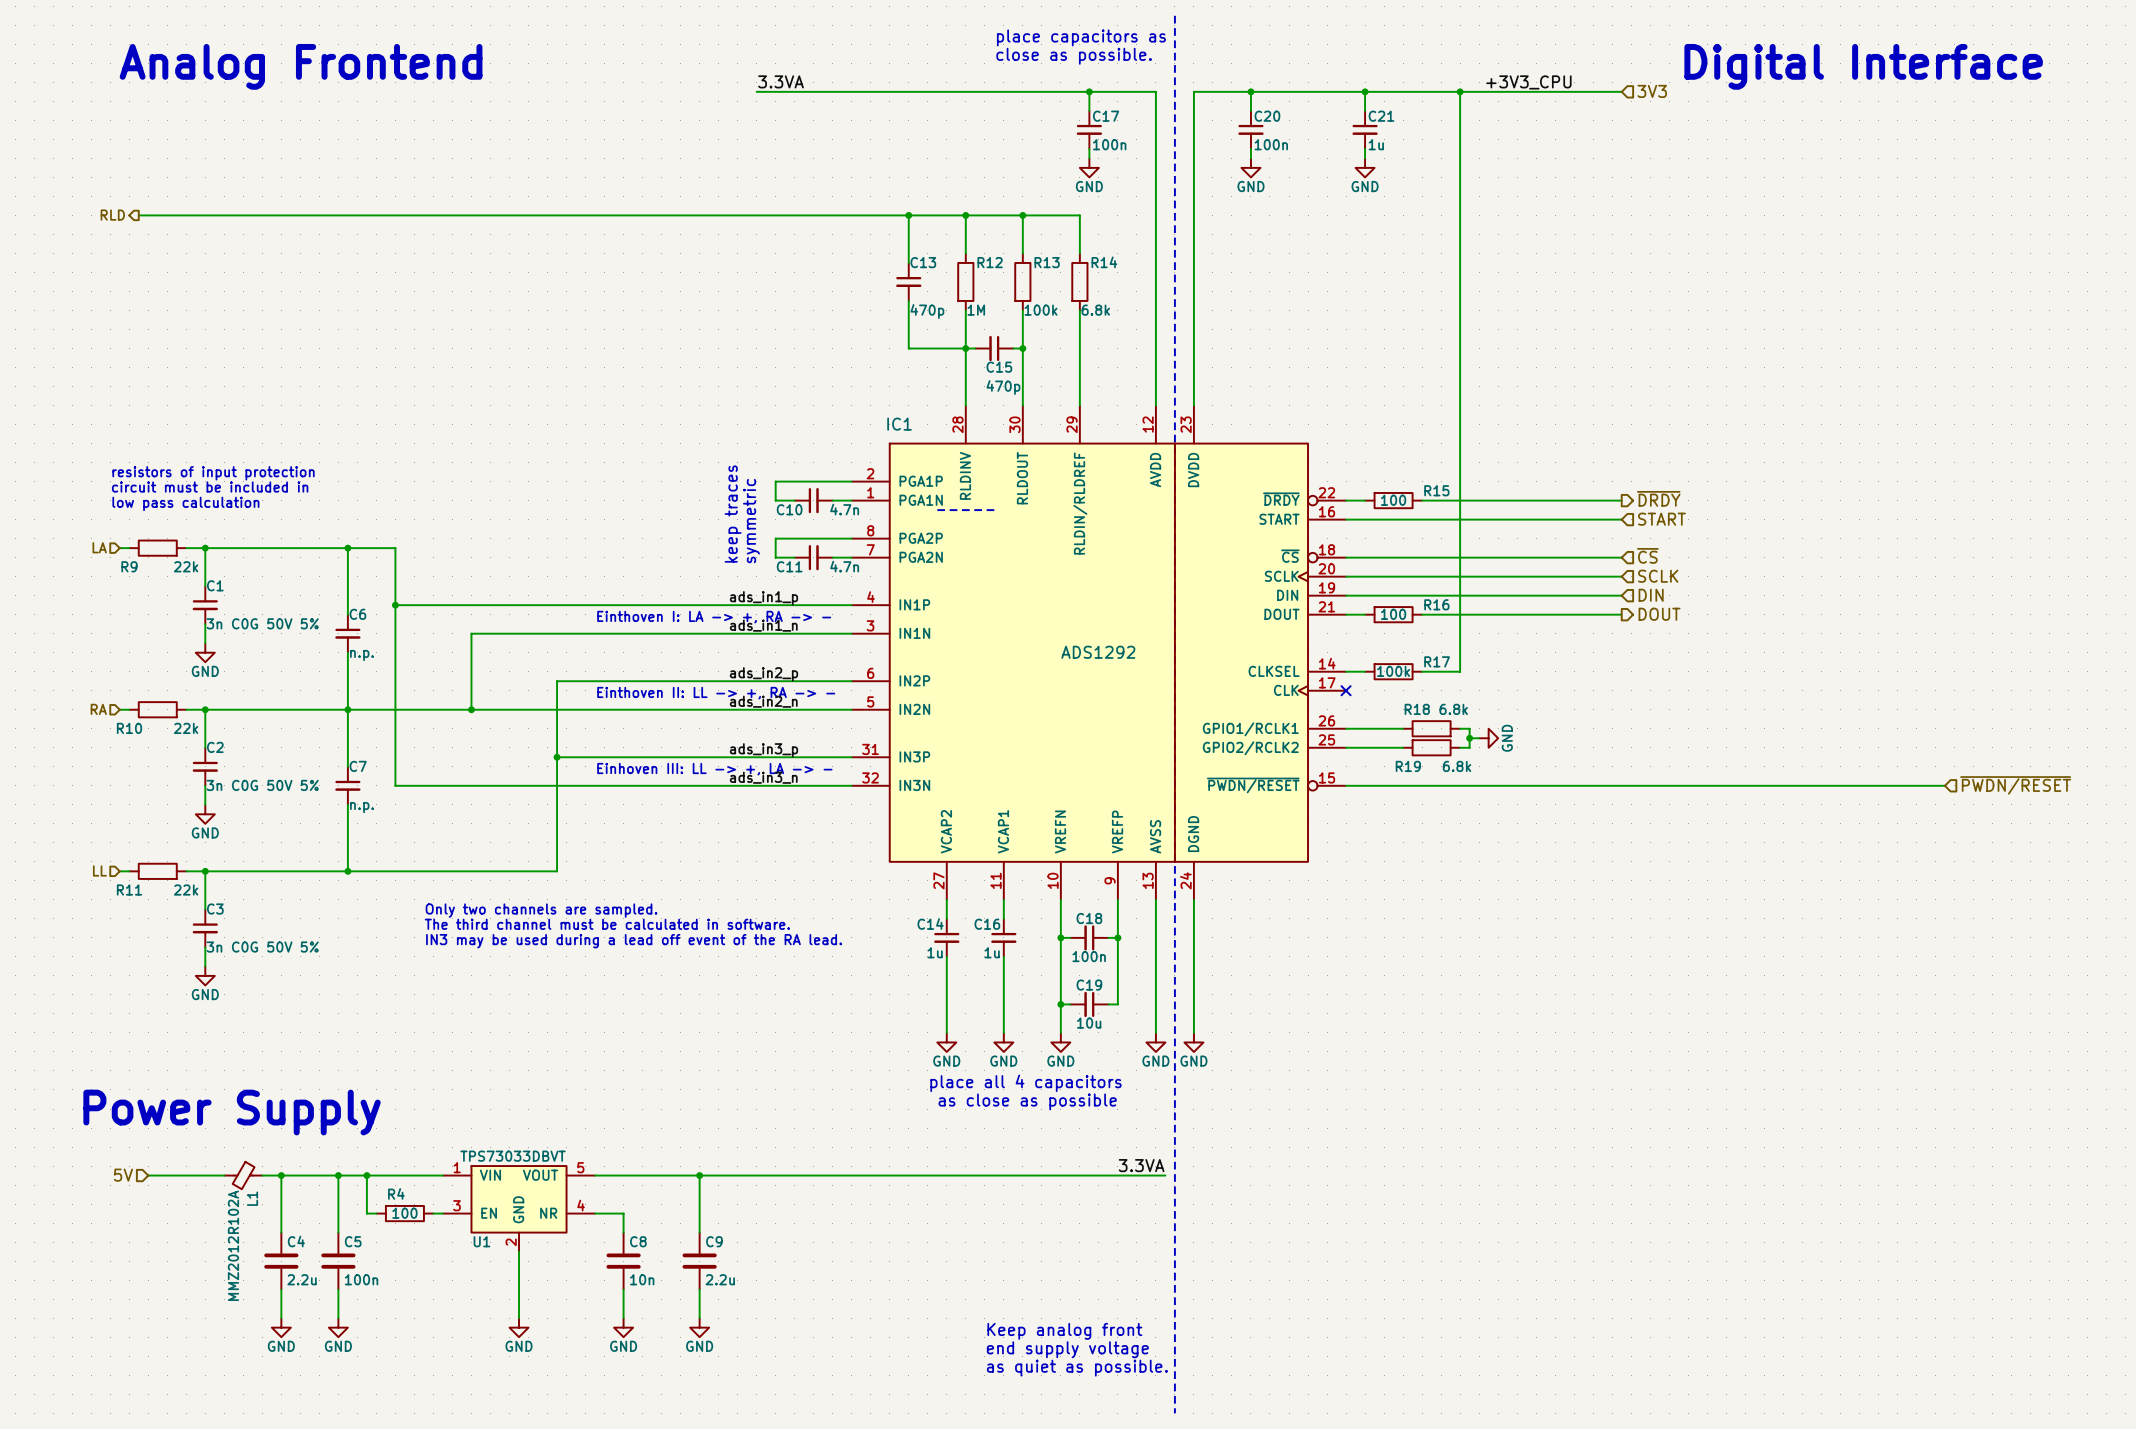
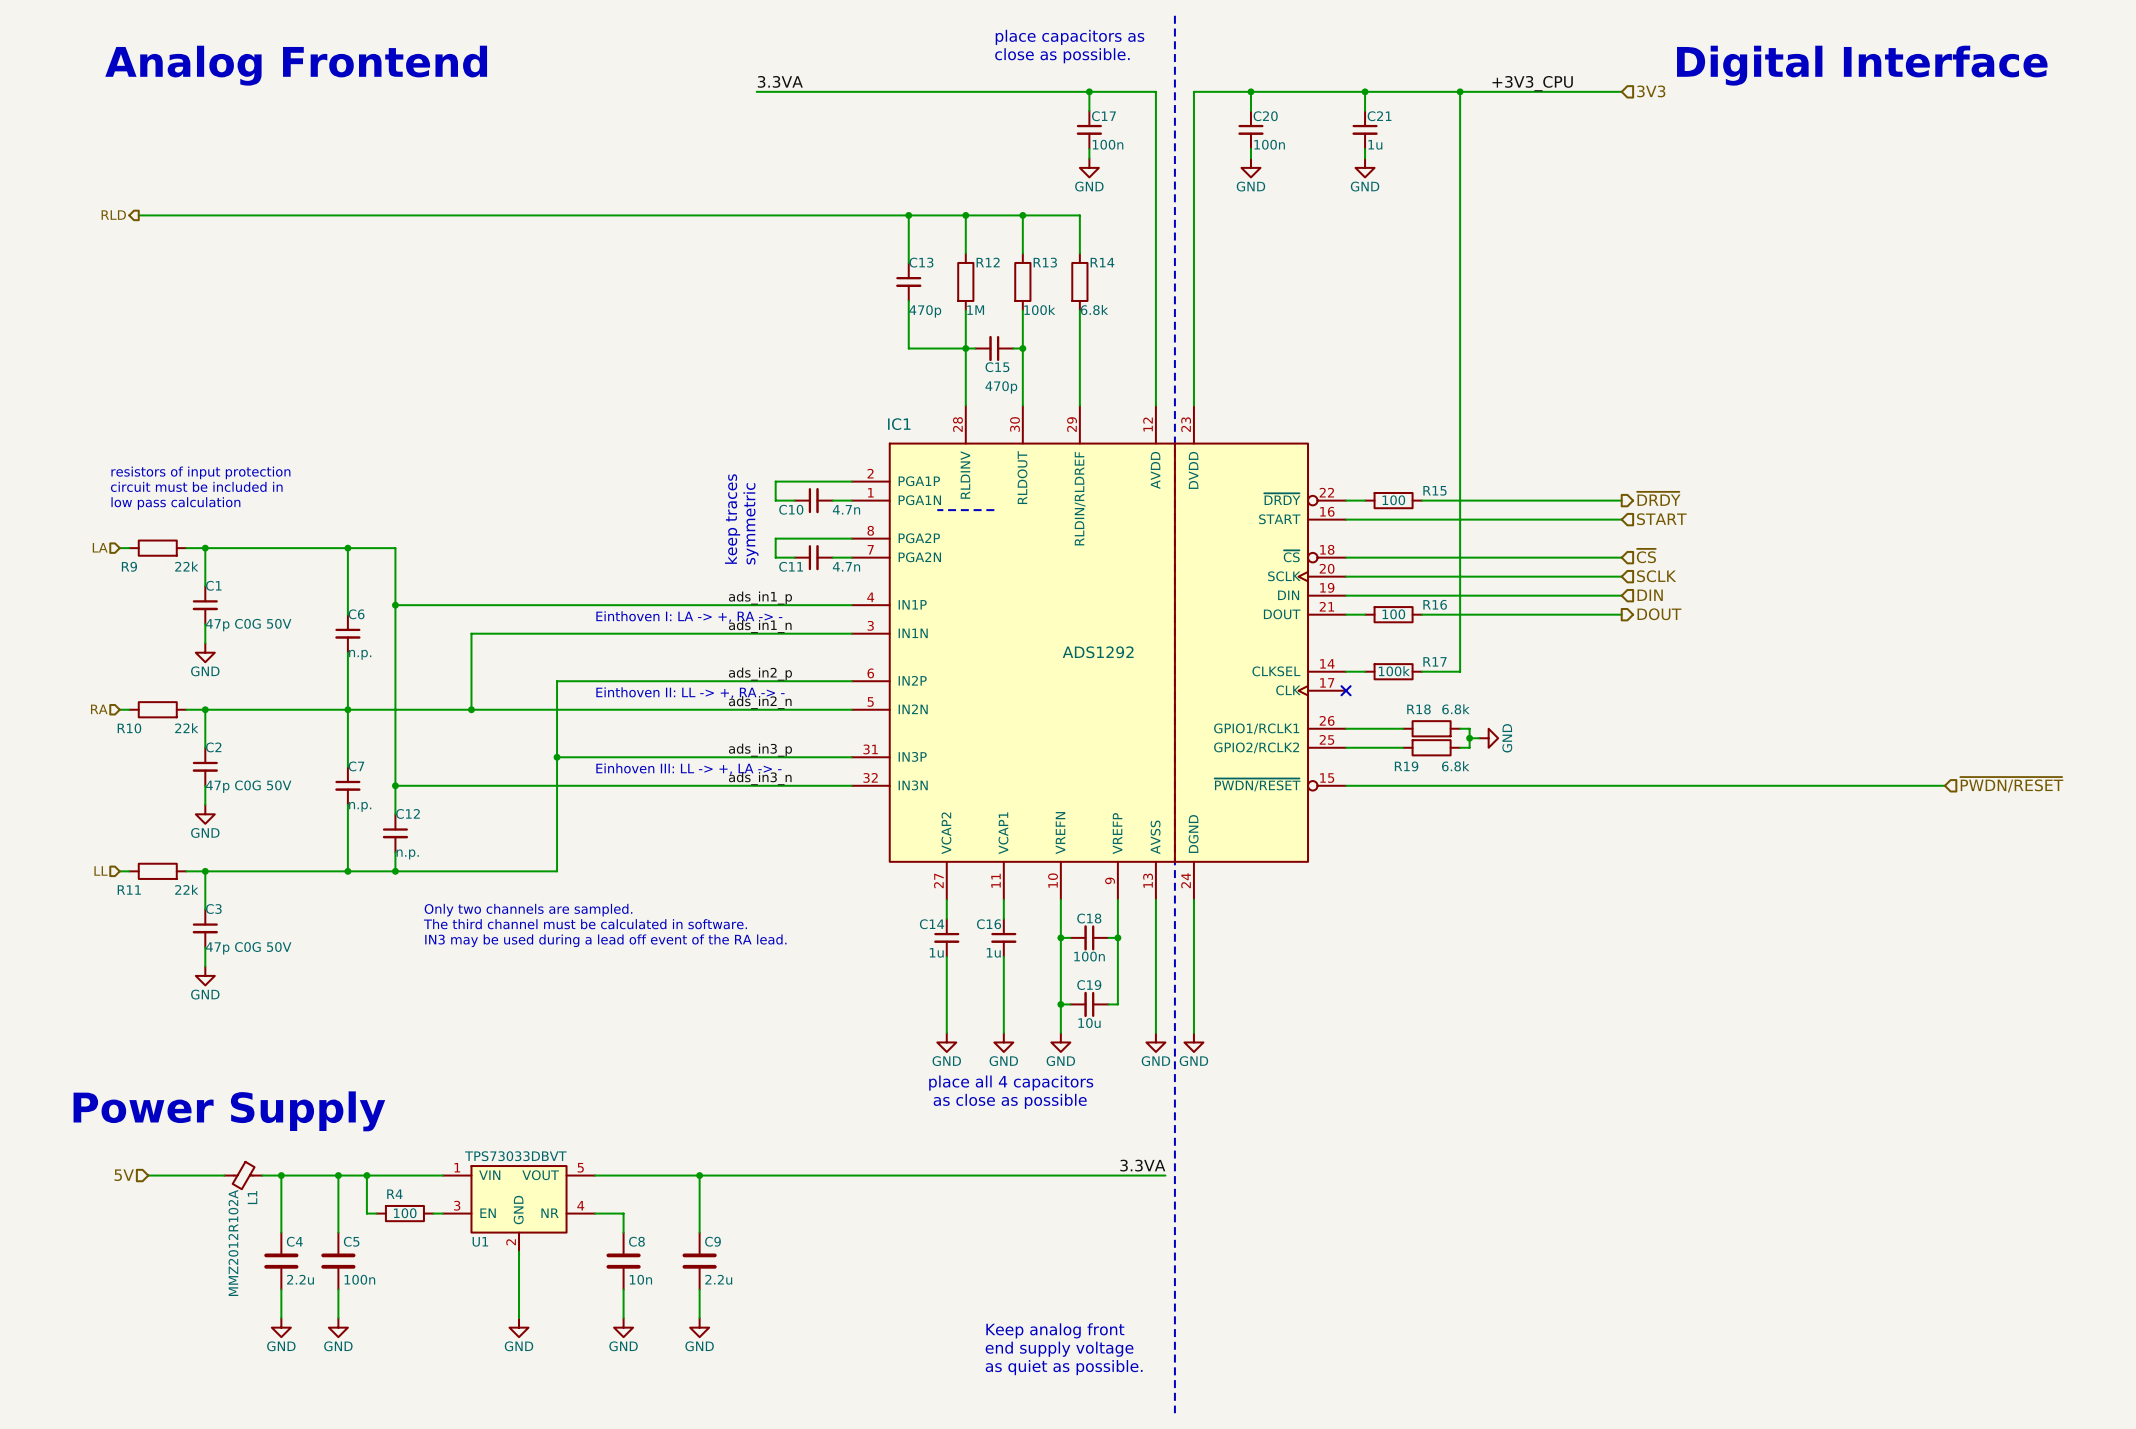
C1 value: 3n C0G 50V 5% (262, 623) -> 47p C0G 50V (248, 625)
C2 value: 3n C0G 50V 5% (262, 785) -> 47p C0G 50V (248, 786)
wire: none -> (395, 785) (395, 814)
junction: none -> (395, 785)
C12: none -> n.p. (395, 833)
wire: none -> (395, 852) (395, 871)
junction: none -> (395, 871)
C3 value: 3n C0G 50V 5% (262, 947) -> 47p C0G 50V (248, 948)

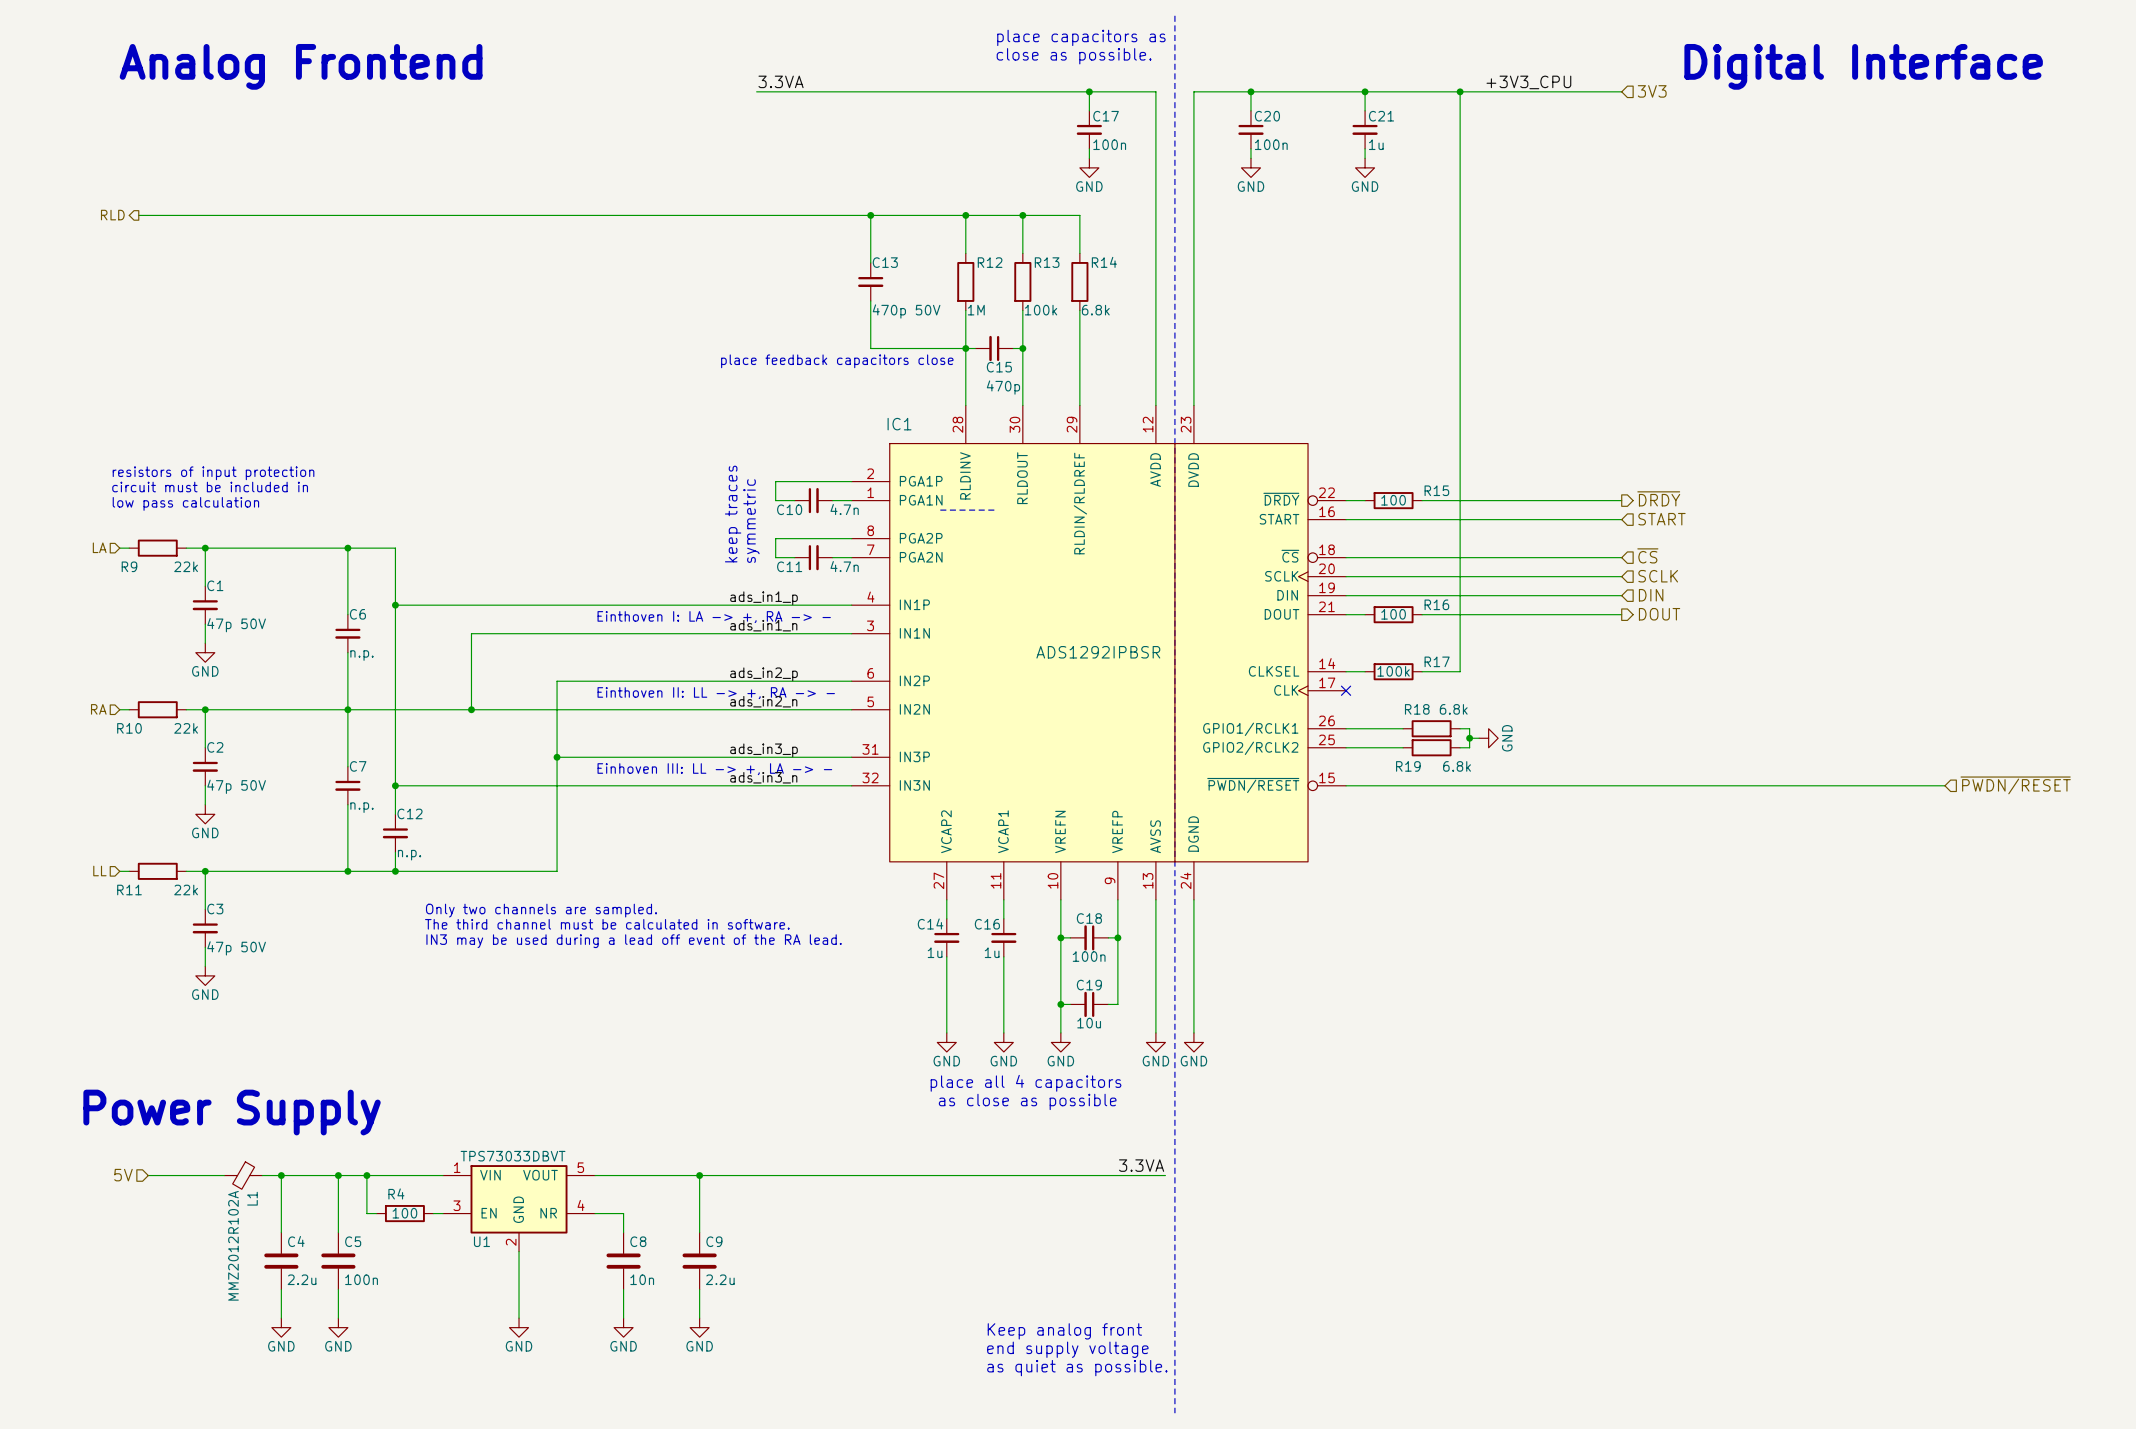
wire: (908, 215) (908, 262) -> (870, 215) (870, 262)
junction position: (908, 215) -> (870, 215)
C13 position: (908, 281) -> (870, 281)
wire: (908, 300) (908, 348) -> (870, 300) (870, 348) (908, 348)
C13 value: 470p (925, 311) -> 470p 50V (906, 311)
text: none -> place feedback capacitors close (837, 361)
C1 value: 47p C0G 50V (248, 625) -> 47p 50V (236, 625)
IC1 value: ADS1292 (1098, 652) -> ADS1292IPBSR (1098, 652)
C2 value: 47p C0G 50V (248, 786) -> 47p 50V (236, 786)
C3 value: 47p C0G 50V (248, 948) -> 47p 50V (236, 948)

